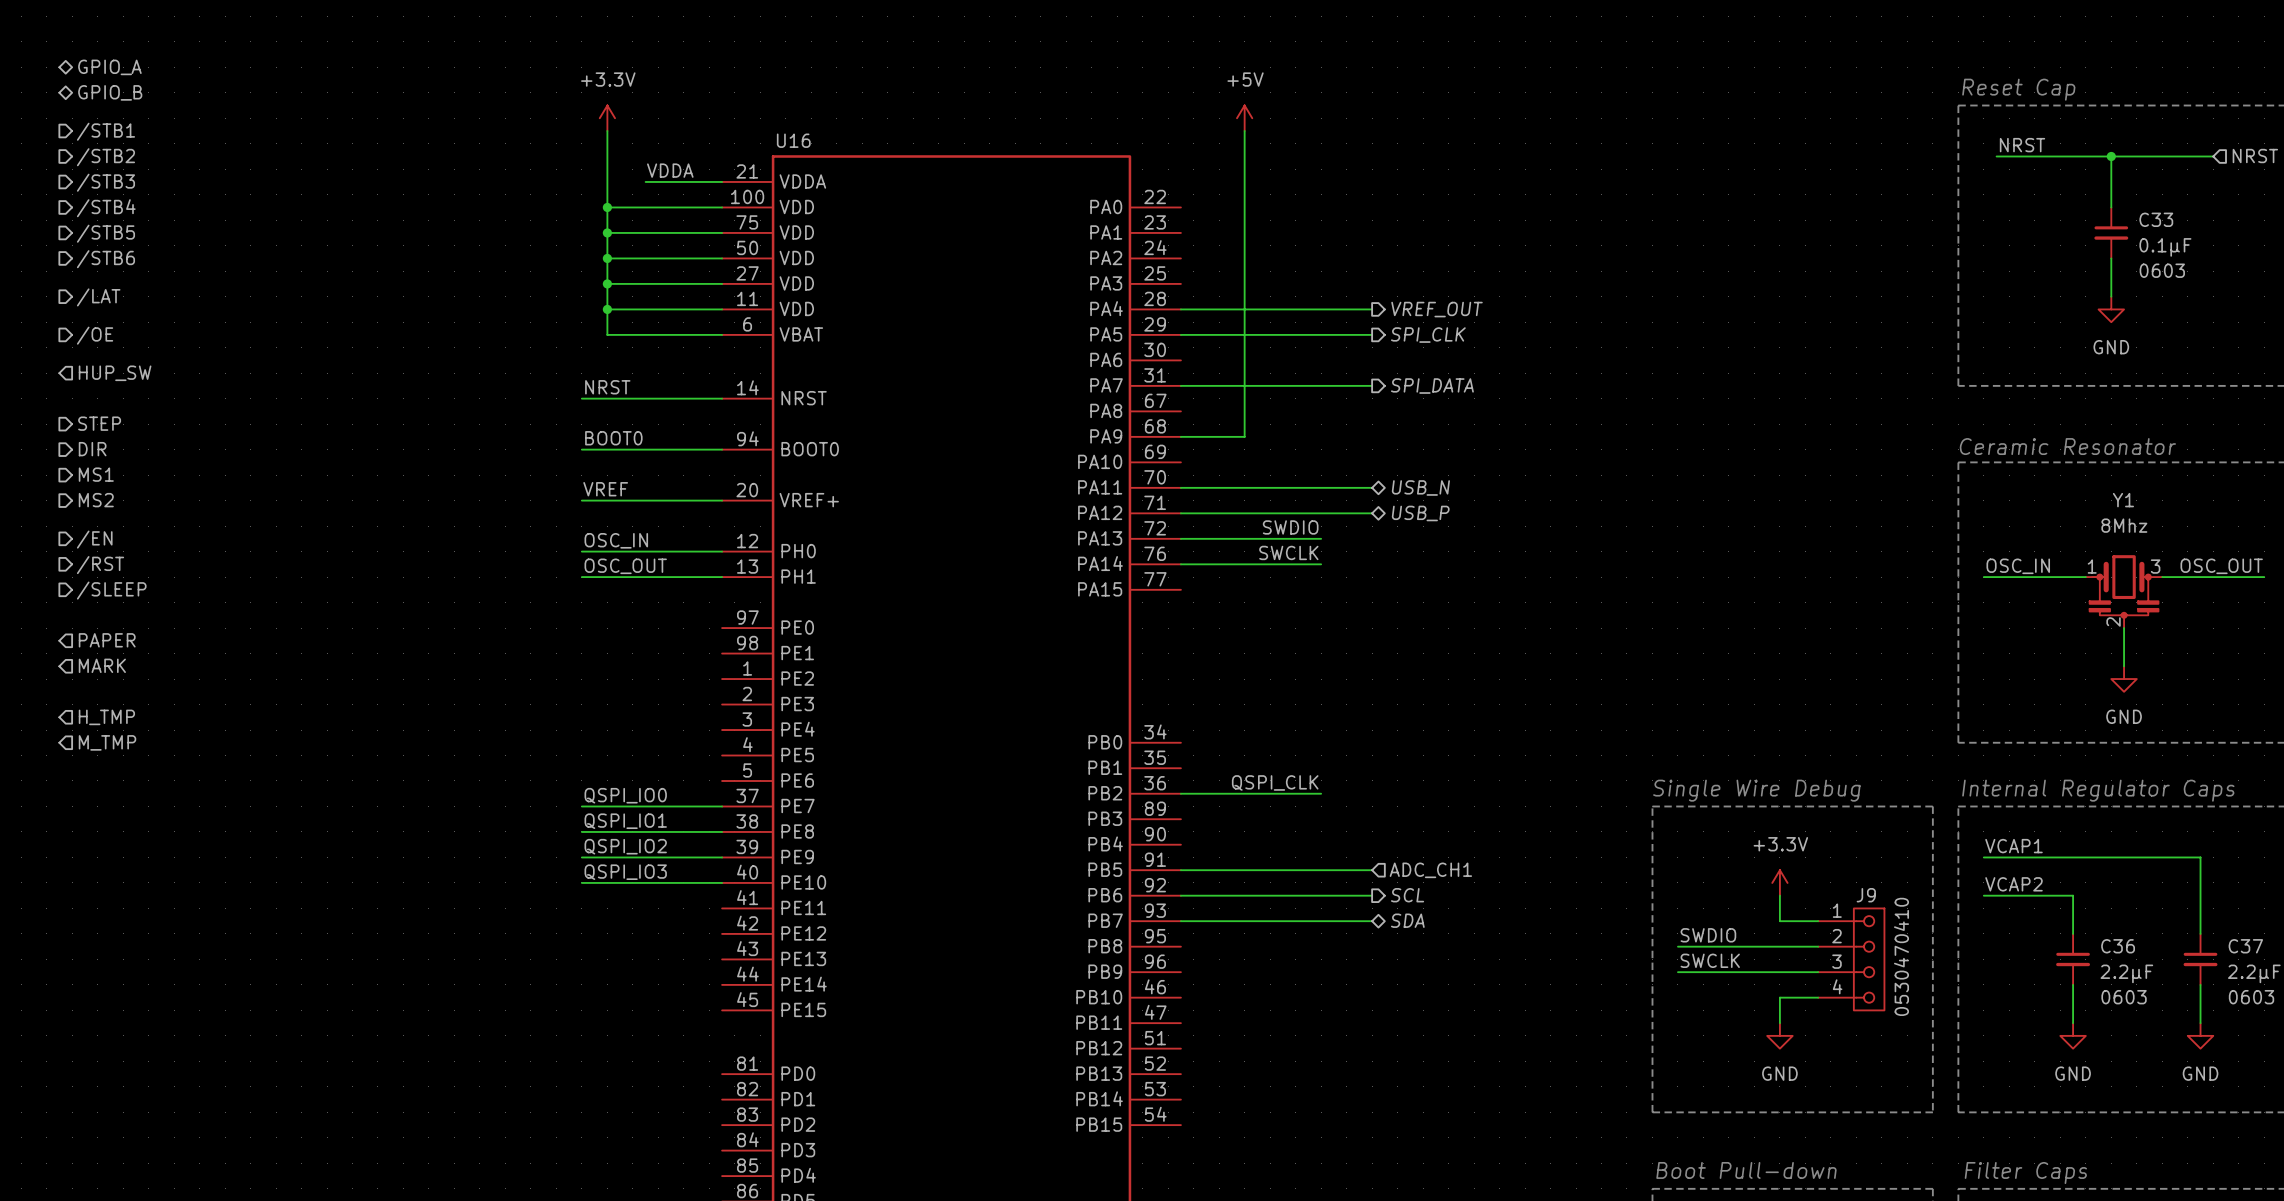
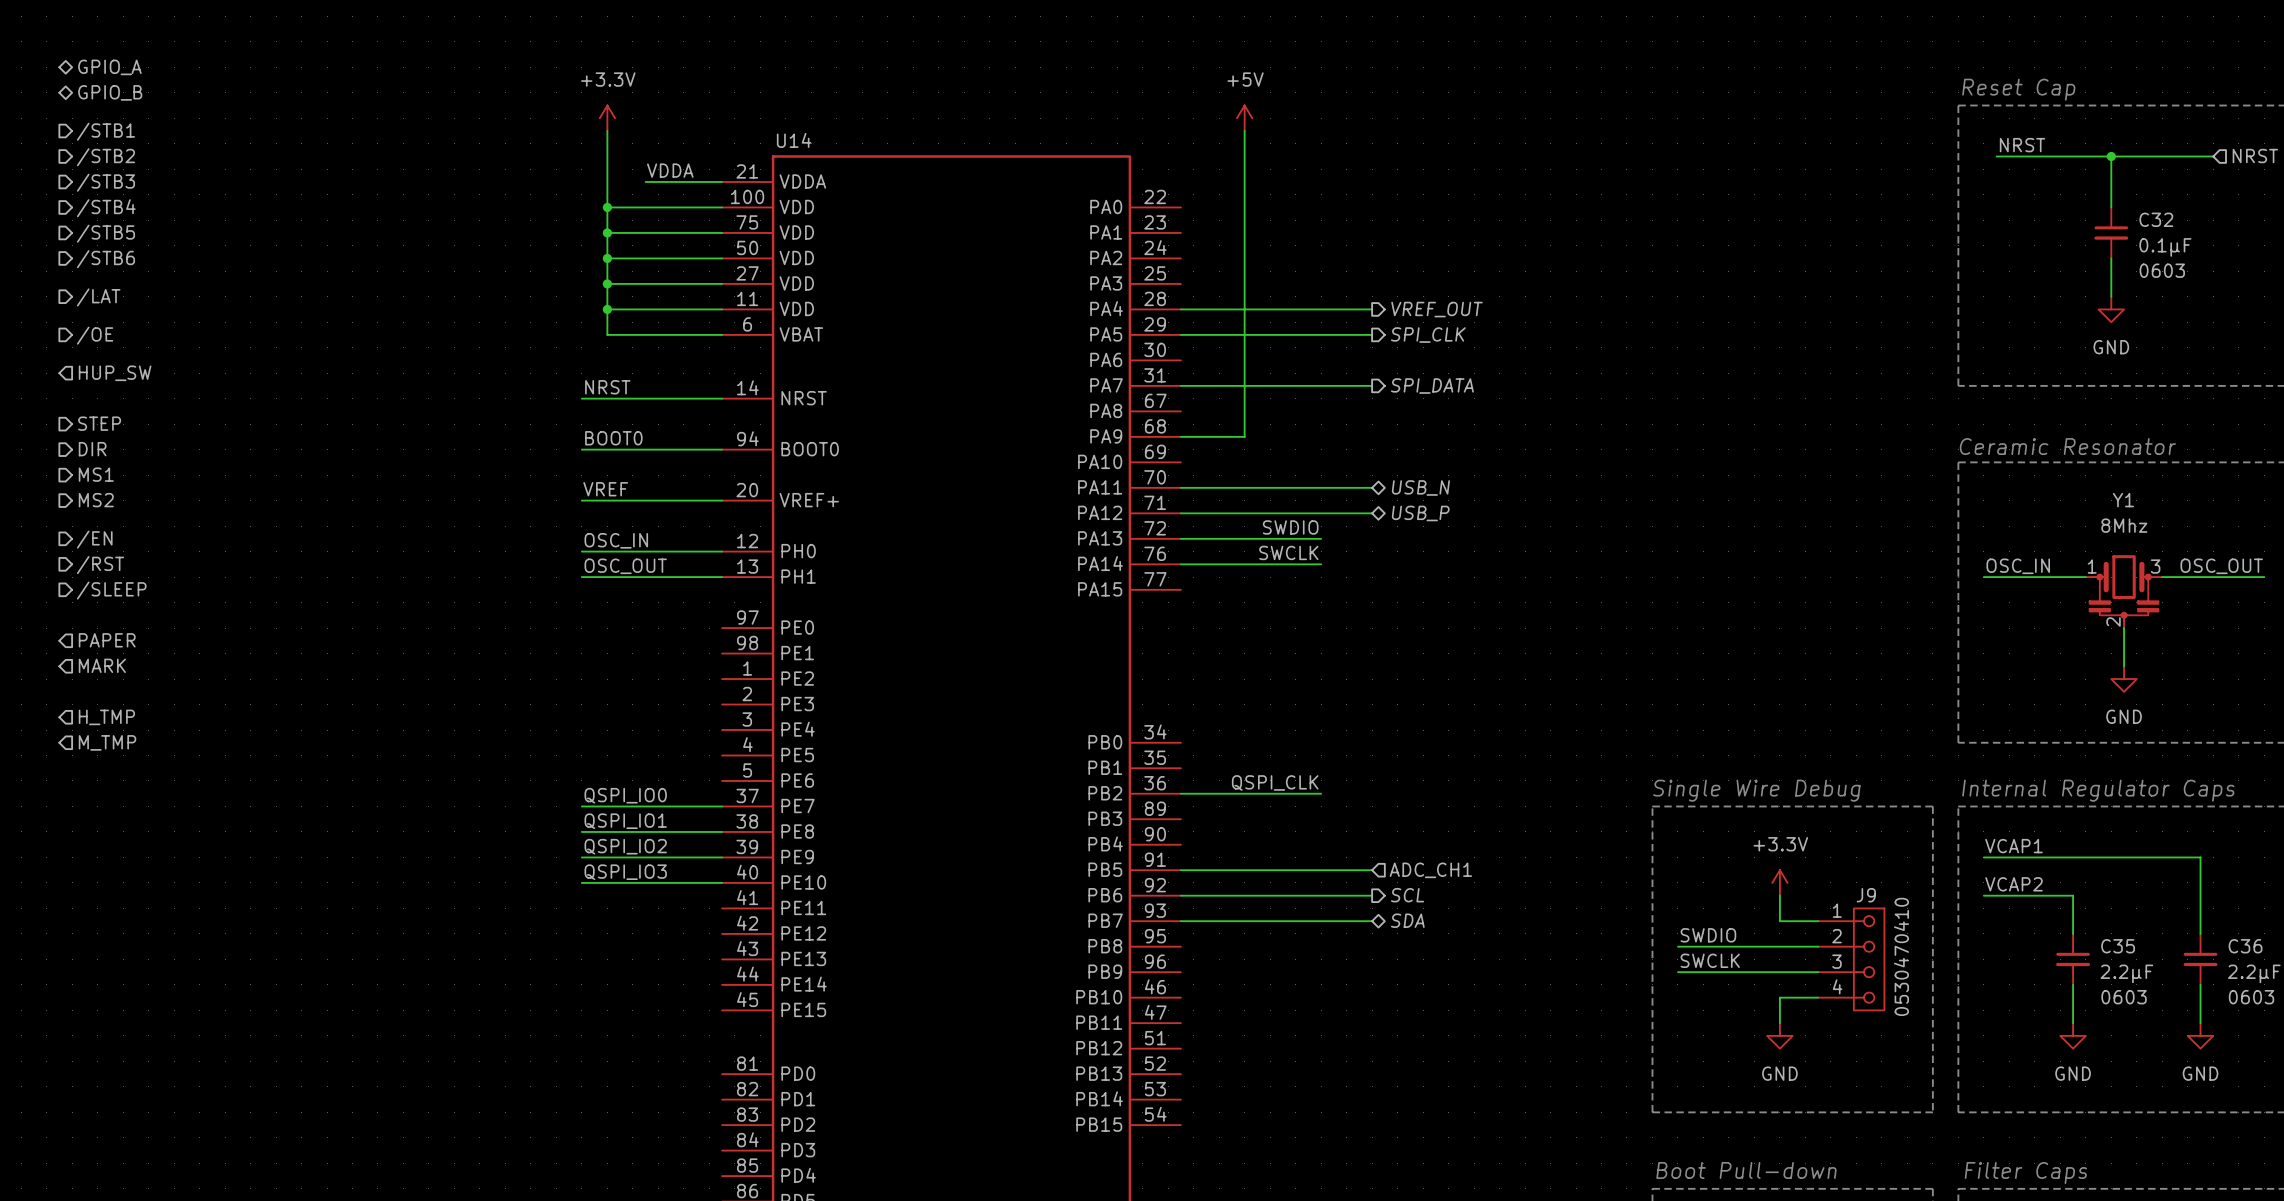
U16 name: U16 (793, 140) -> U14 (794, 140)
C33 name: C33 (2156, 219) -> C32 (2156, 219)
C36 name: C36 (2118, 946) -> C35 (2118, 946)
C37 name: C37 (2245, 946) -> C36 (2245, 946)

